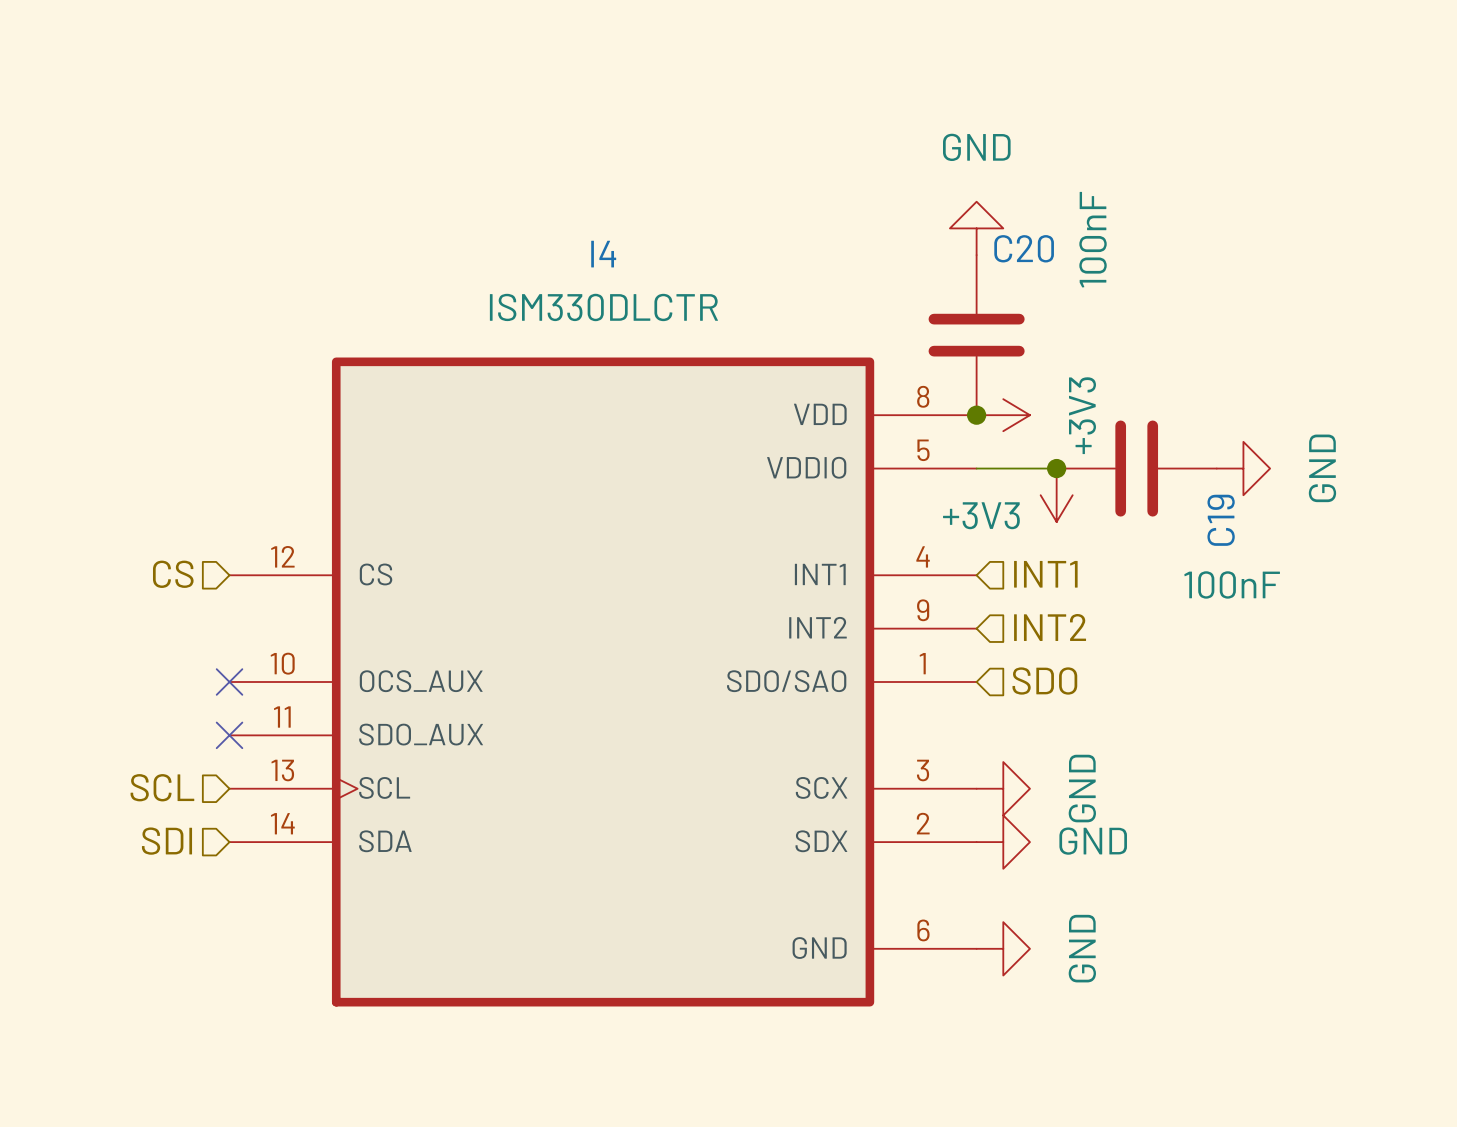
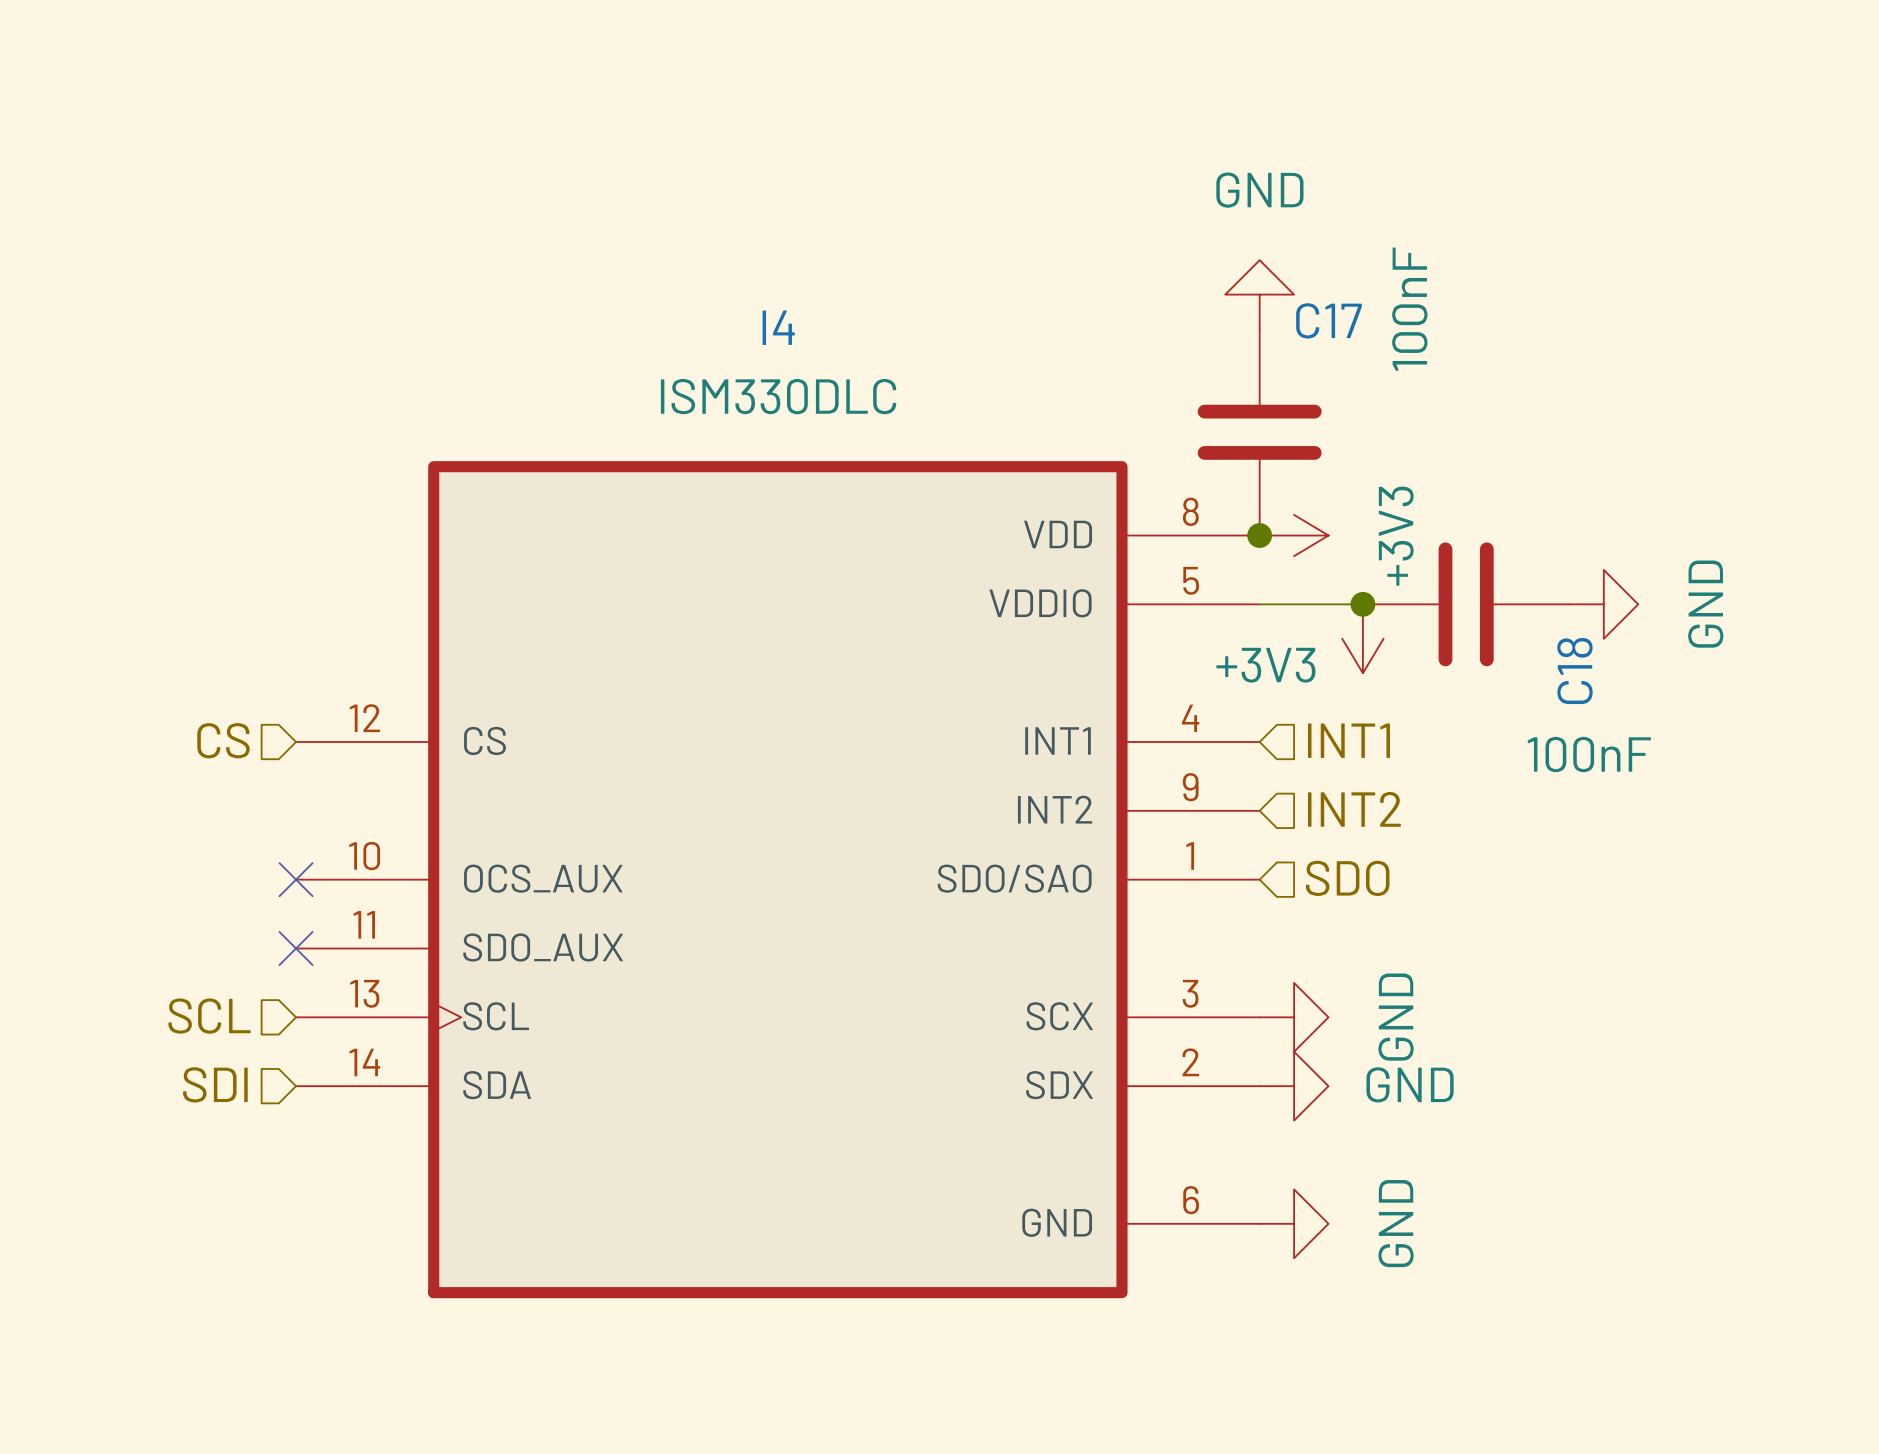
C20 name: C20 (1024, 248) -> C17 (1328, 320)
I4 value: ISM330DLCTR (603, 307) -> ISM330DLC (778, 396)
C19 name: C19 (1221, 520) -> C18 (1574, 670)

